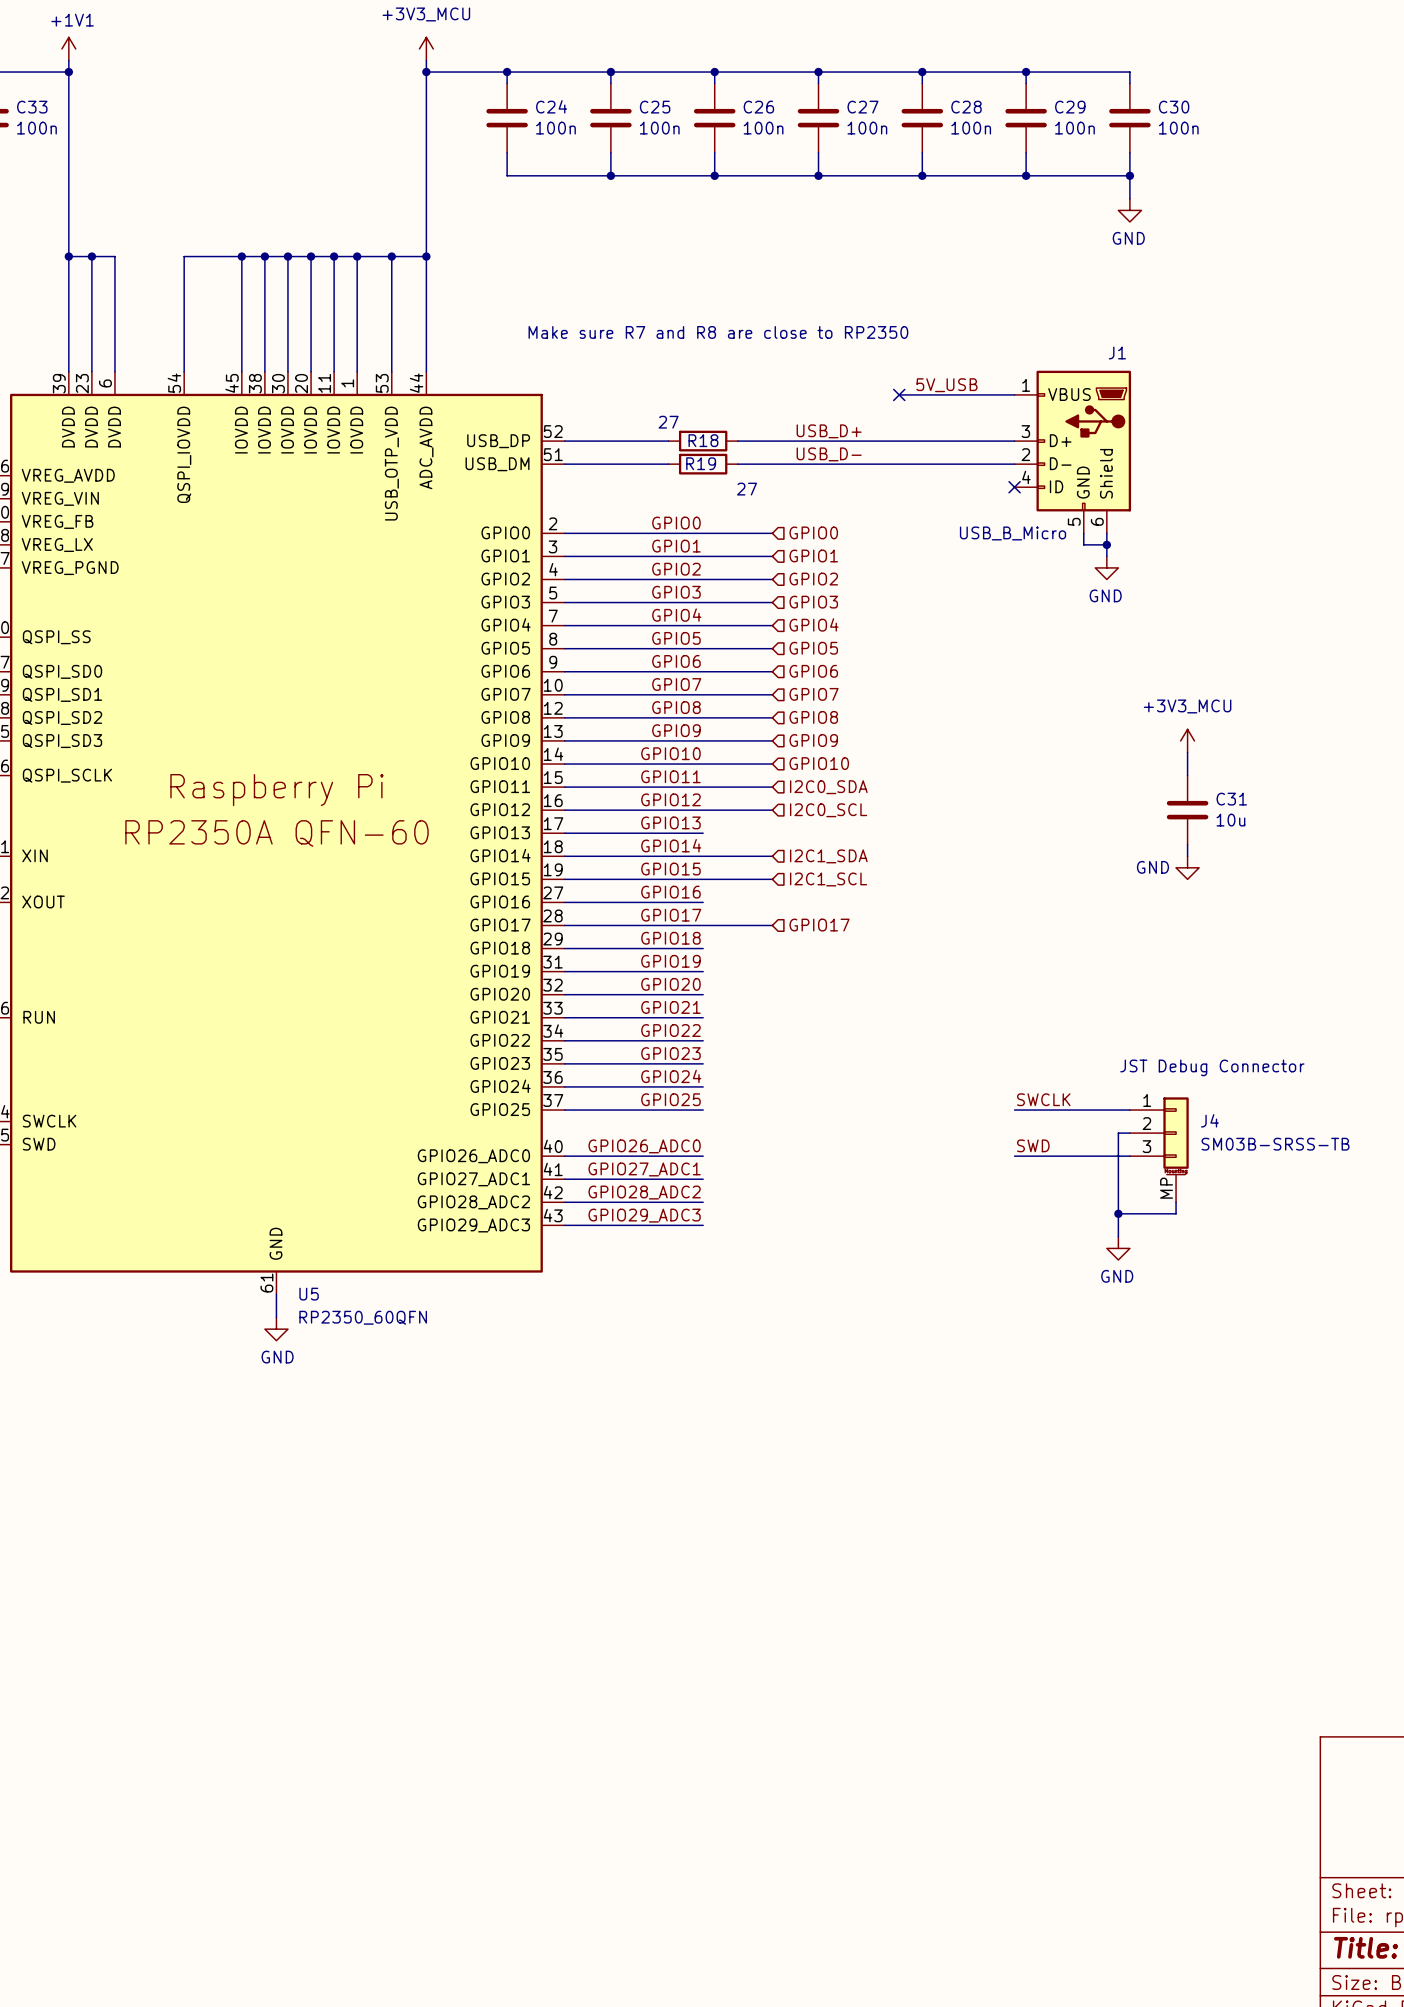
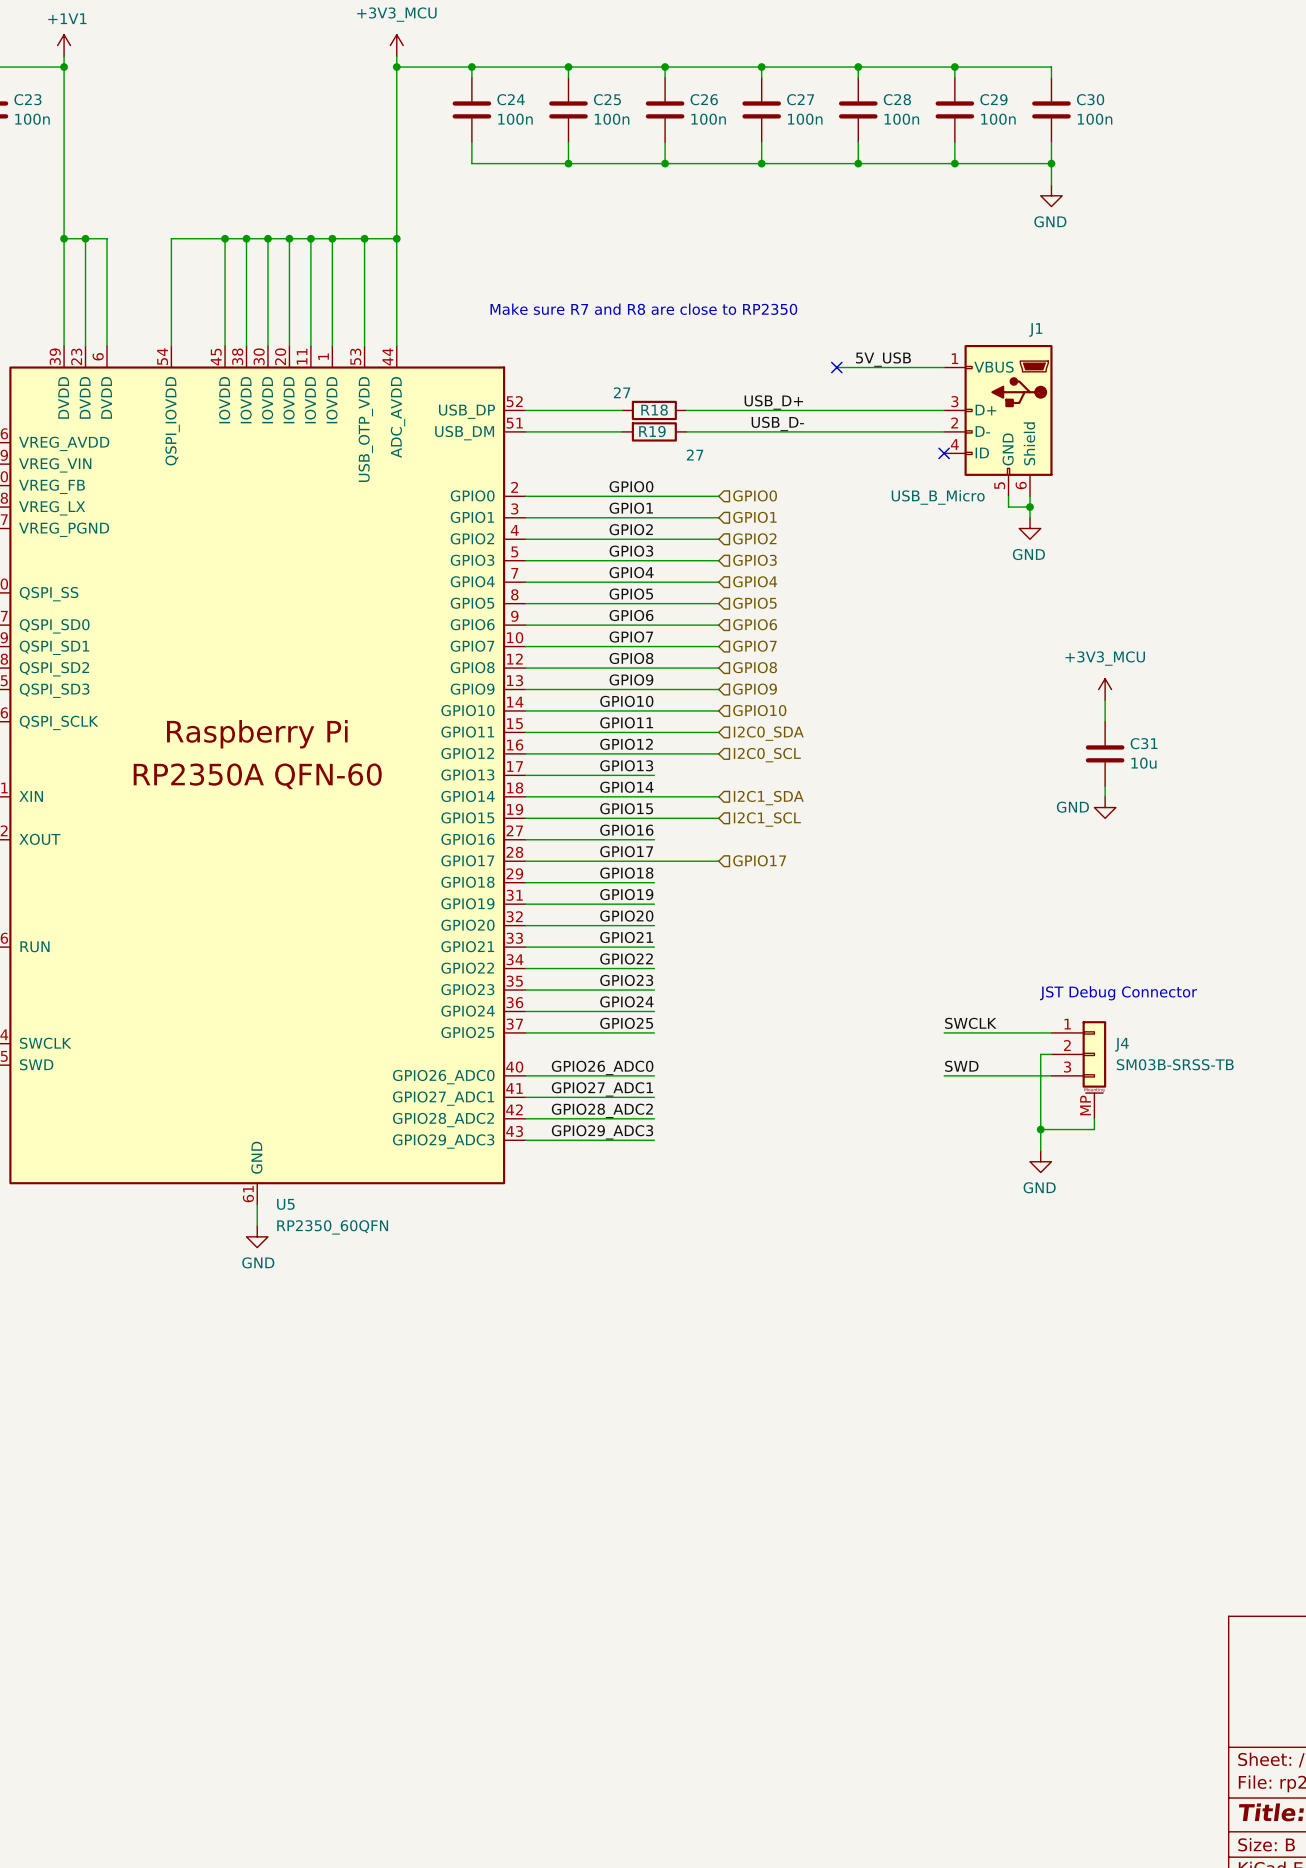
C33 name: C33 (32, 107) -> C23 (27, 99)

